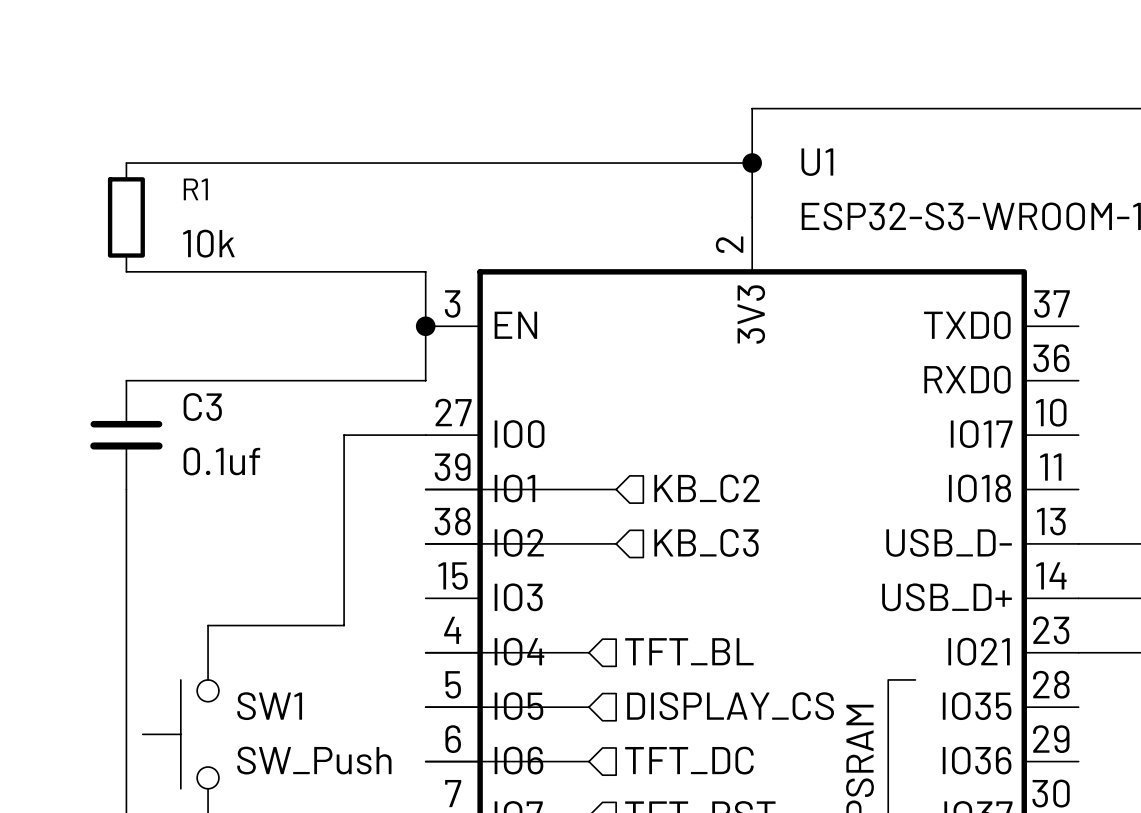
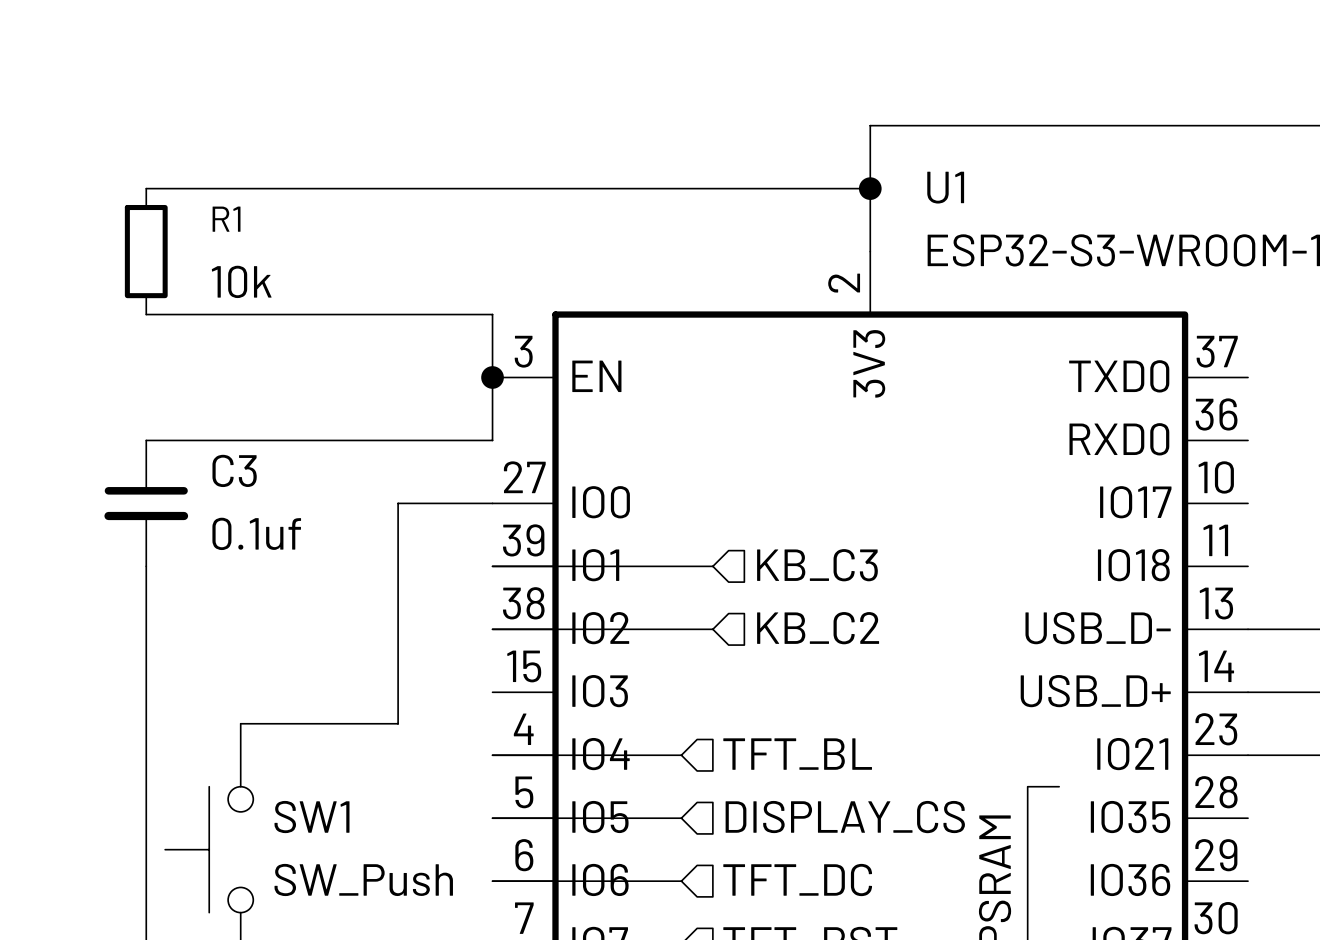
hierarchical label: KB_C2 (707, 488) -> KB_C3 (817, 565)
hierarchical label: KB_C3 (706, 542) -> KB_C2 (818, 628)

